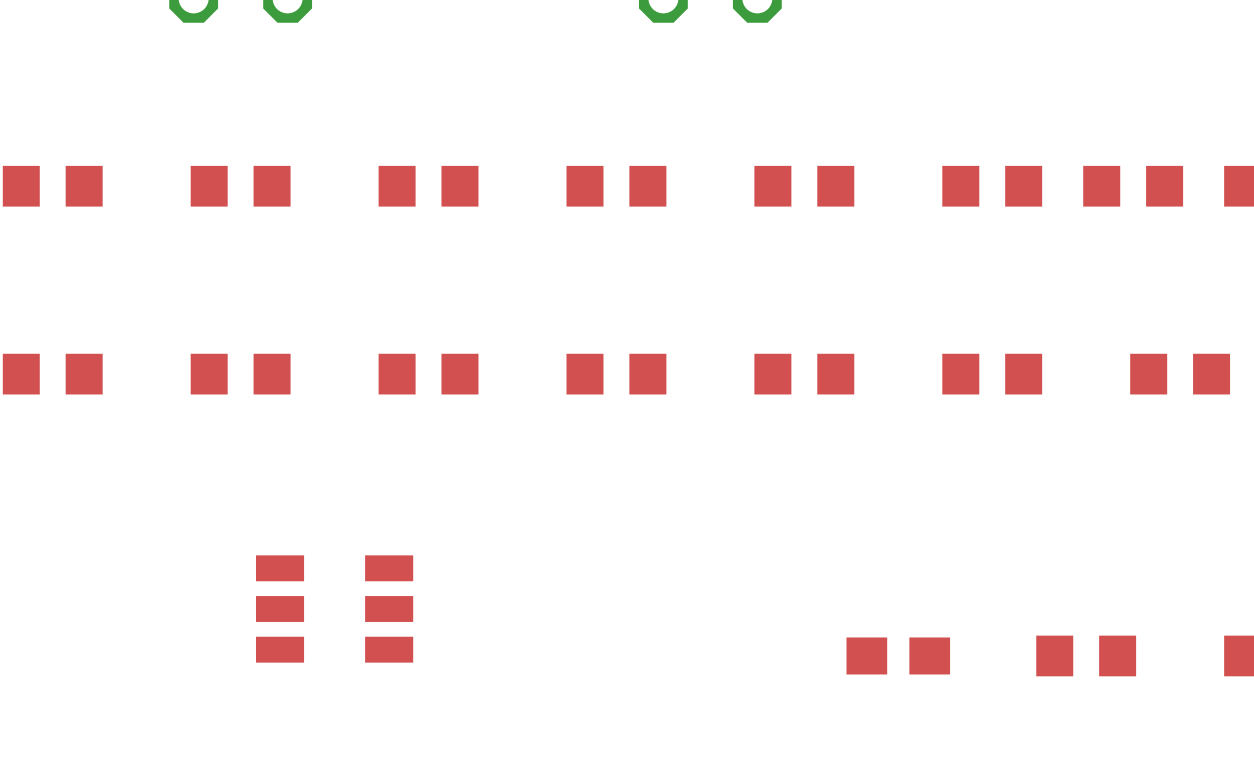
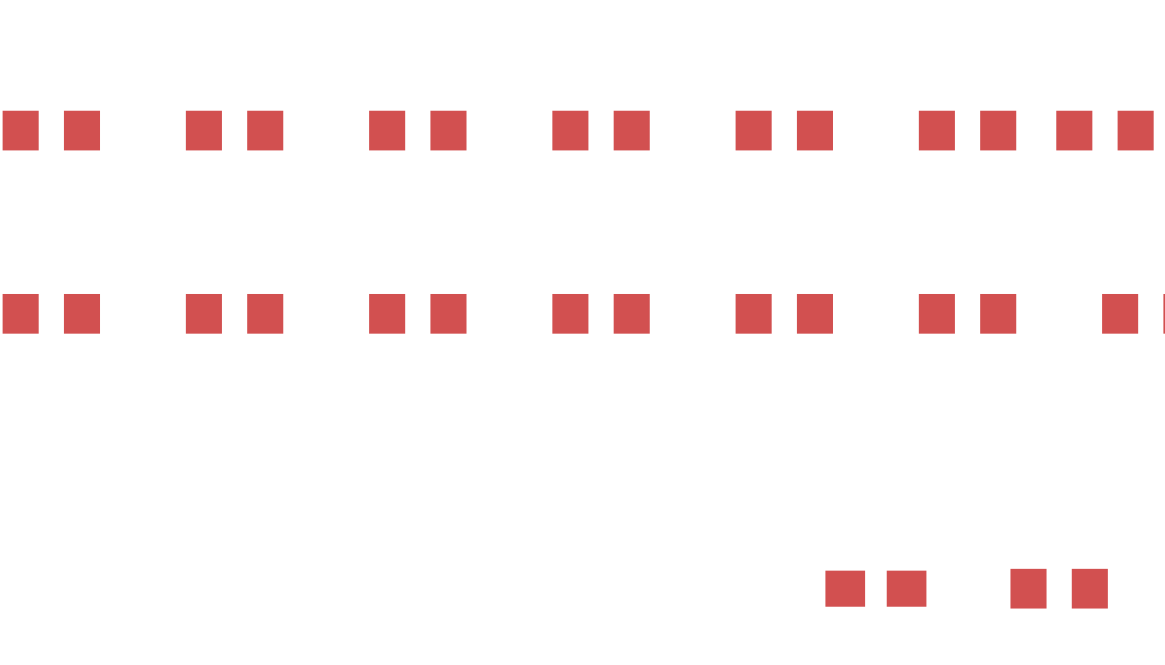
part: (334, 609) -> none

